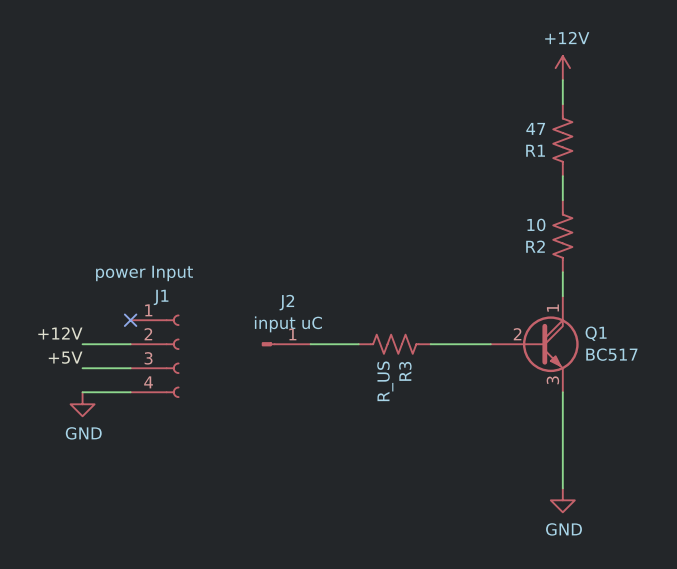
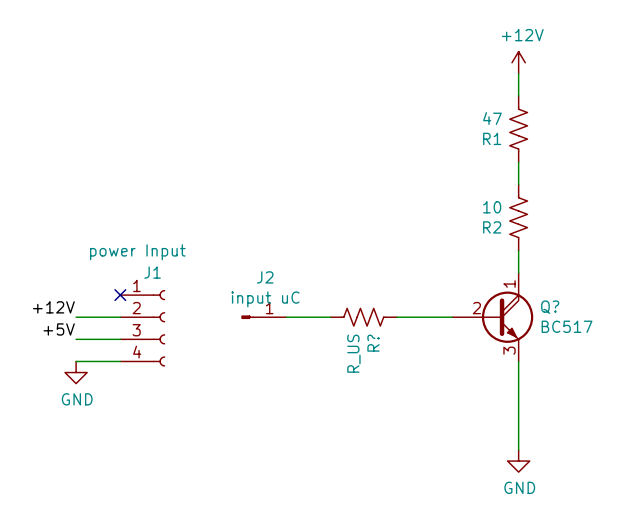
Q1 name: Q1 (596, 333) -> Q? (550, 307)
R3 name: R3 (405, 371) -> R? (373, 343)

